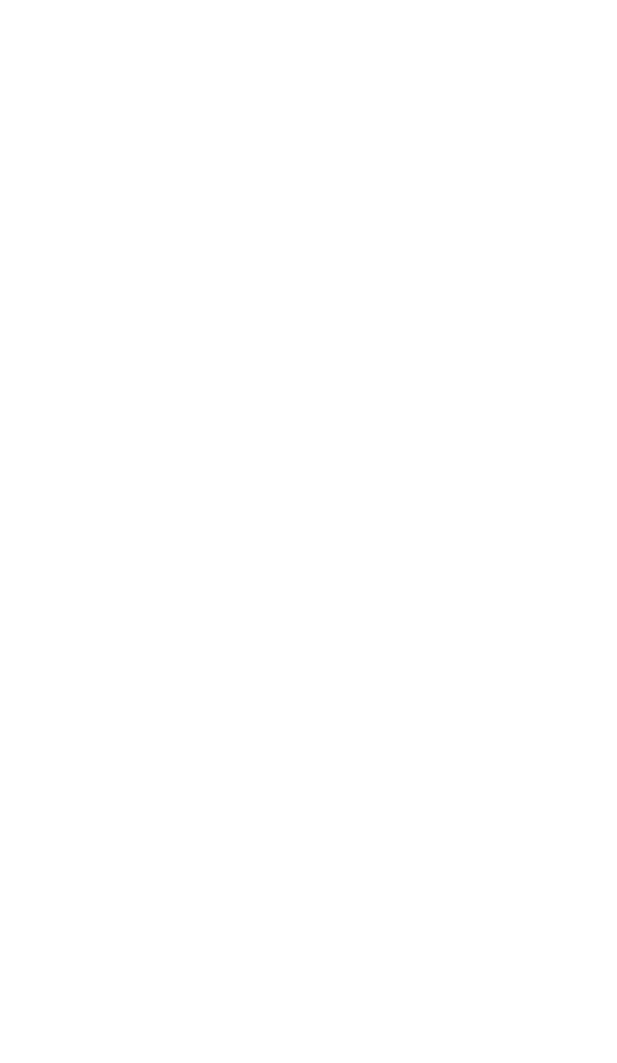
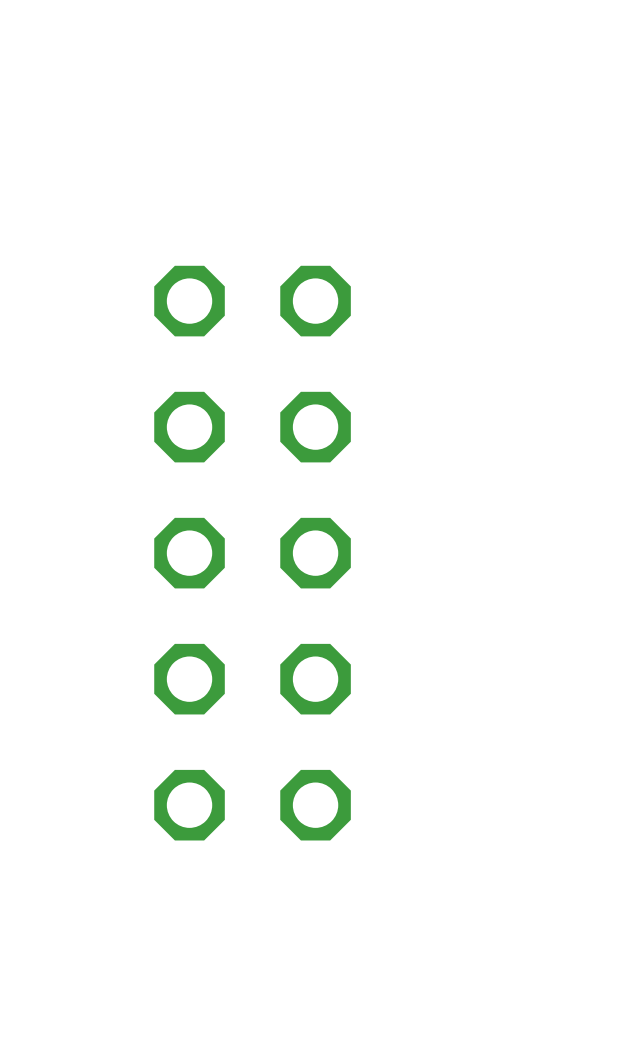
part: none -> (252, 553)

